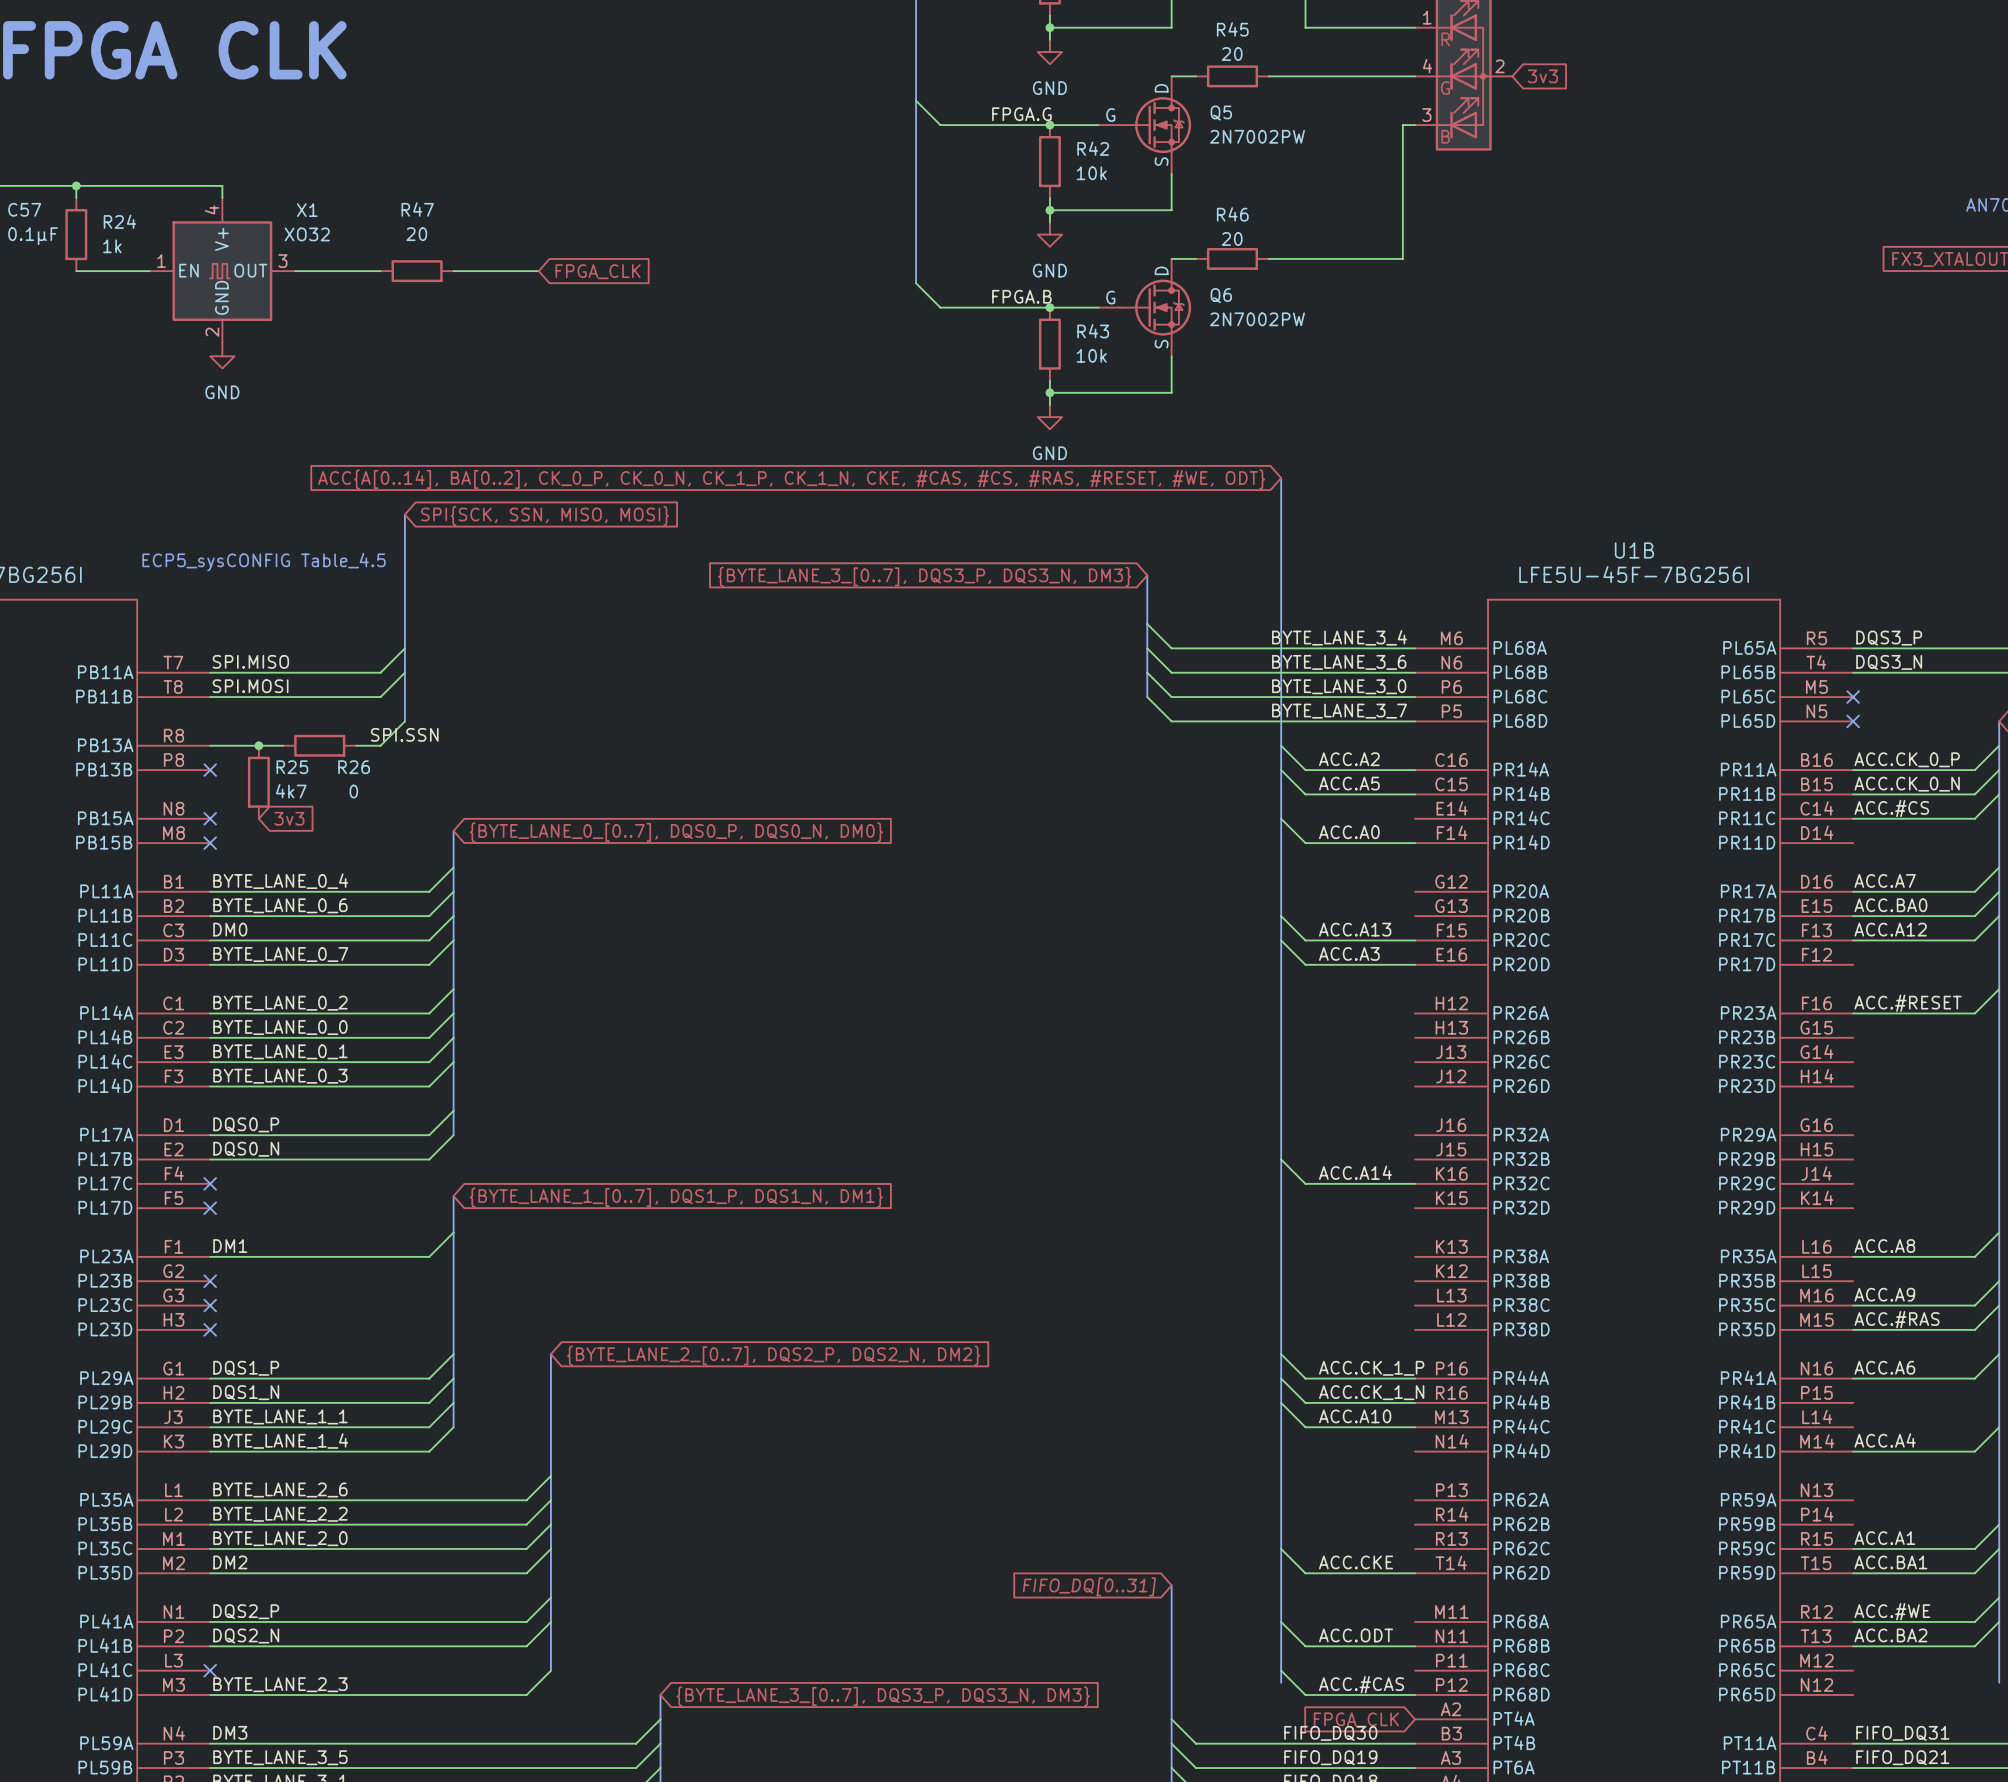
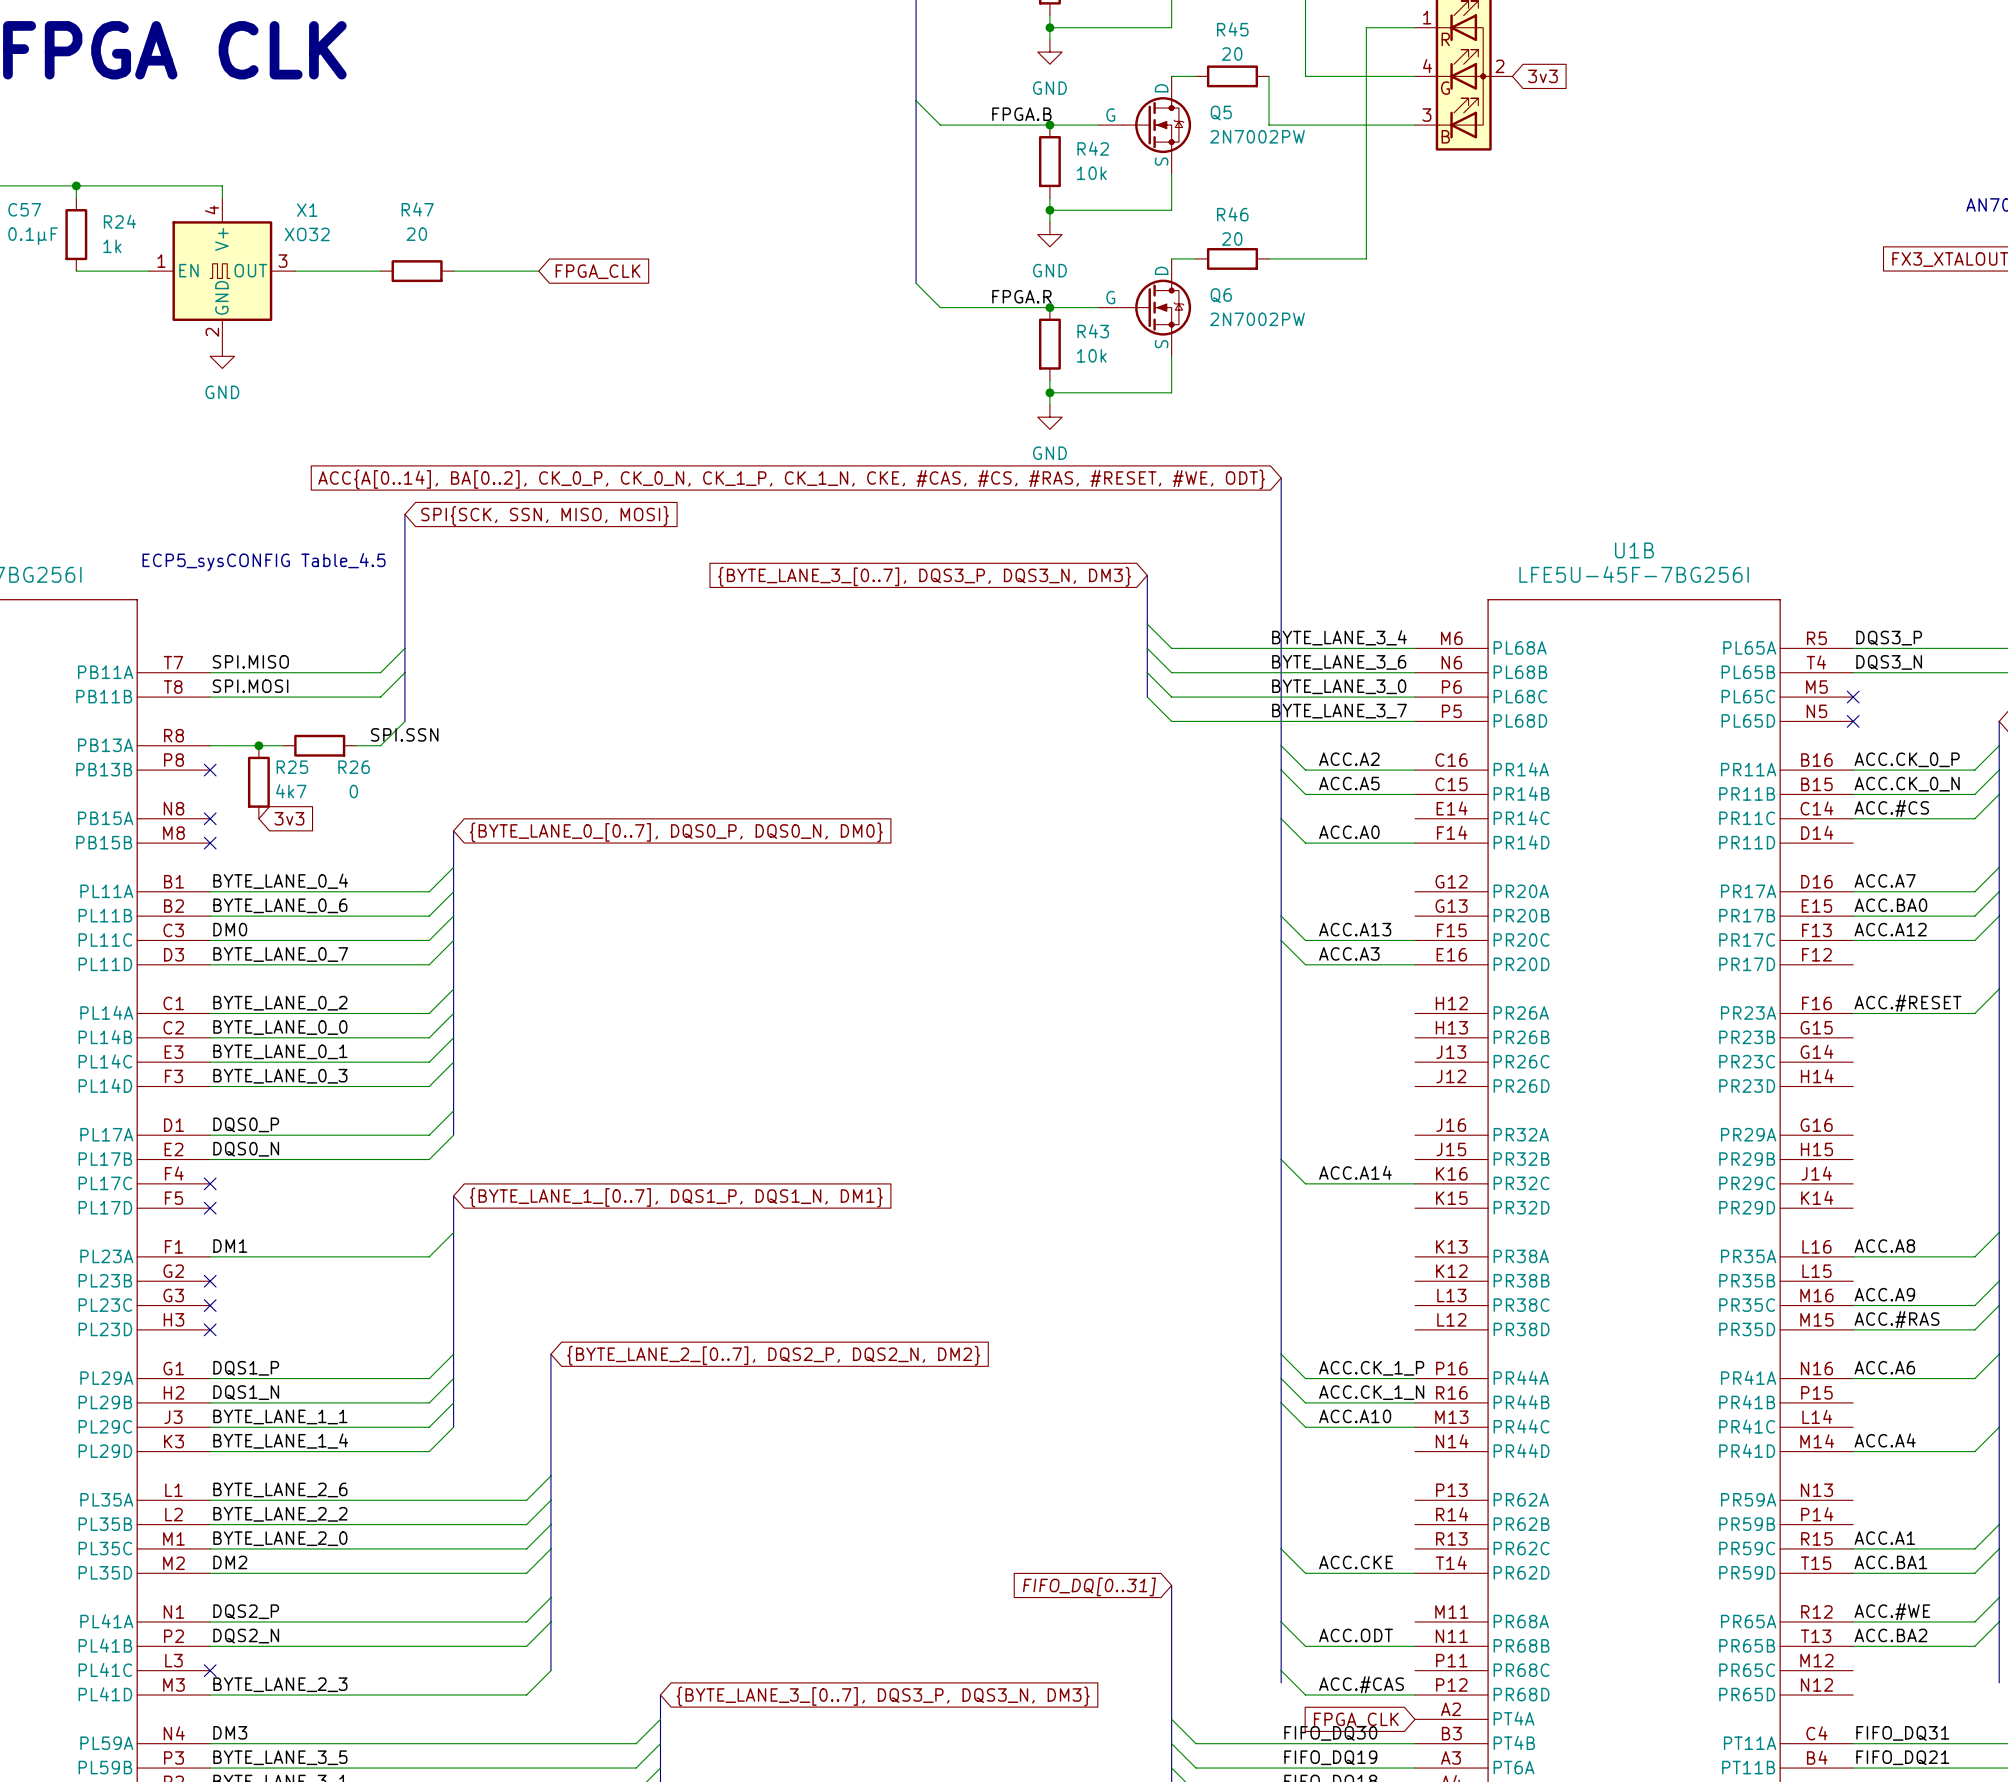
wire: (1305, 27) (1366, 27) -> none
wire: (1268, 76) (1305, 76) -> (1305, 27) (1305, 76)
wire: none -> (1268, 76) (1268, 125) (1402, 125)
label: FPGA.G (1021, 114) -> FPGA.B (1021, 114)
wire: (1402, 125) (1402, 258) (1366, 258) -> (1366, 27) (1366, 258)
label: FPGA.B (1021, 296) -> FPGA.R (1021, 296)

